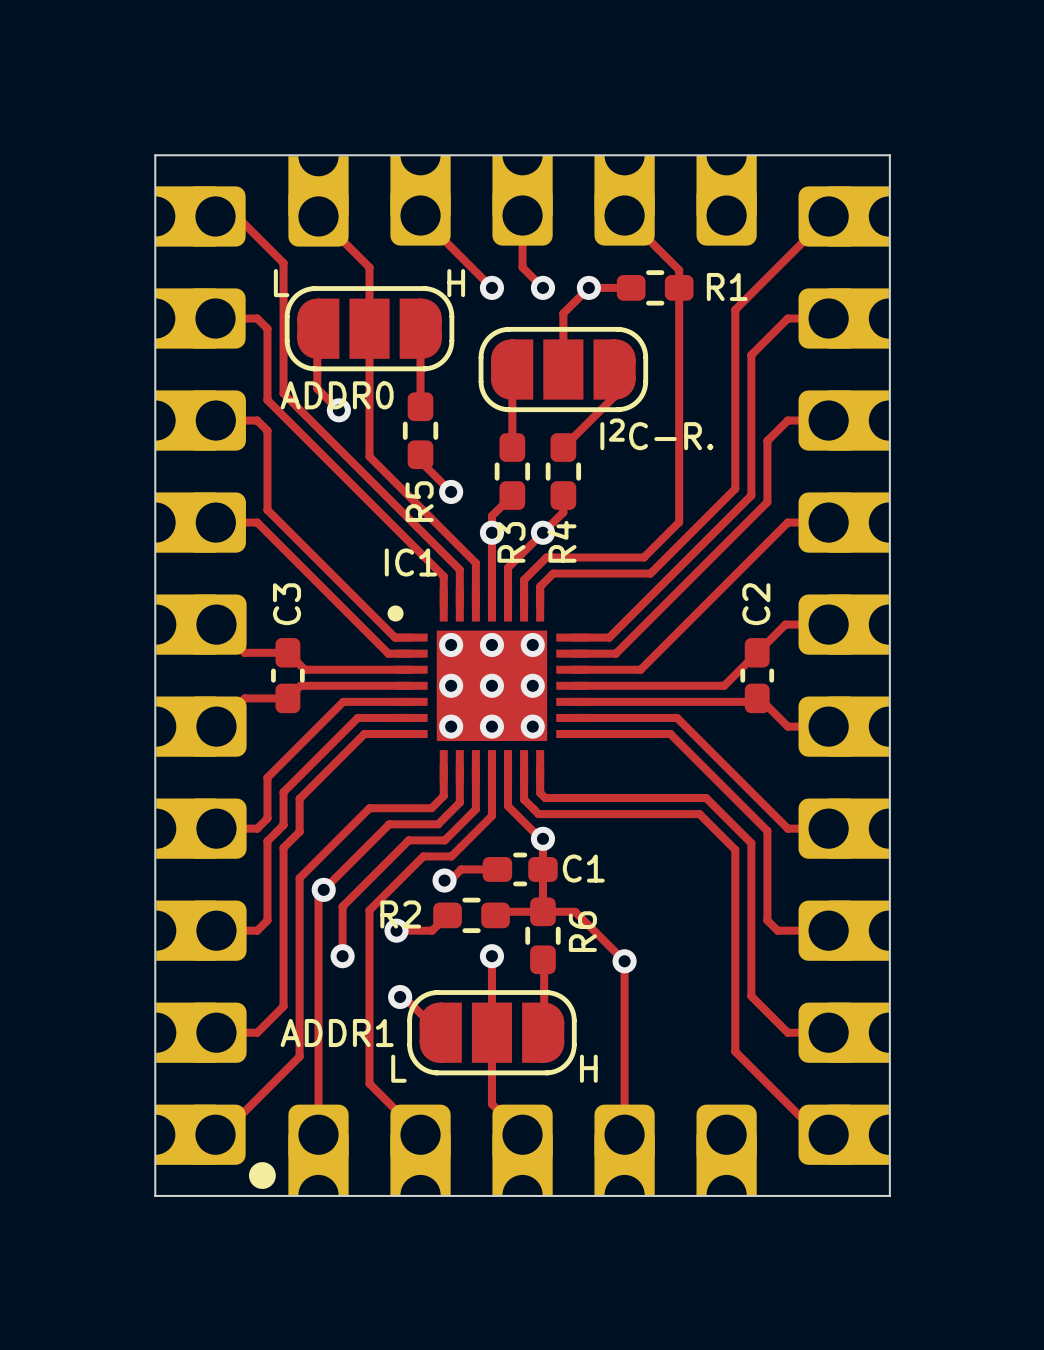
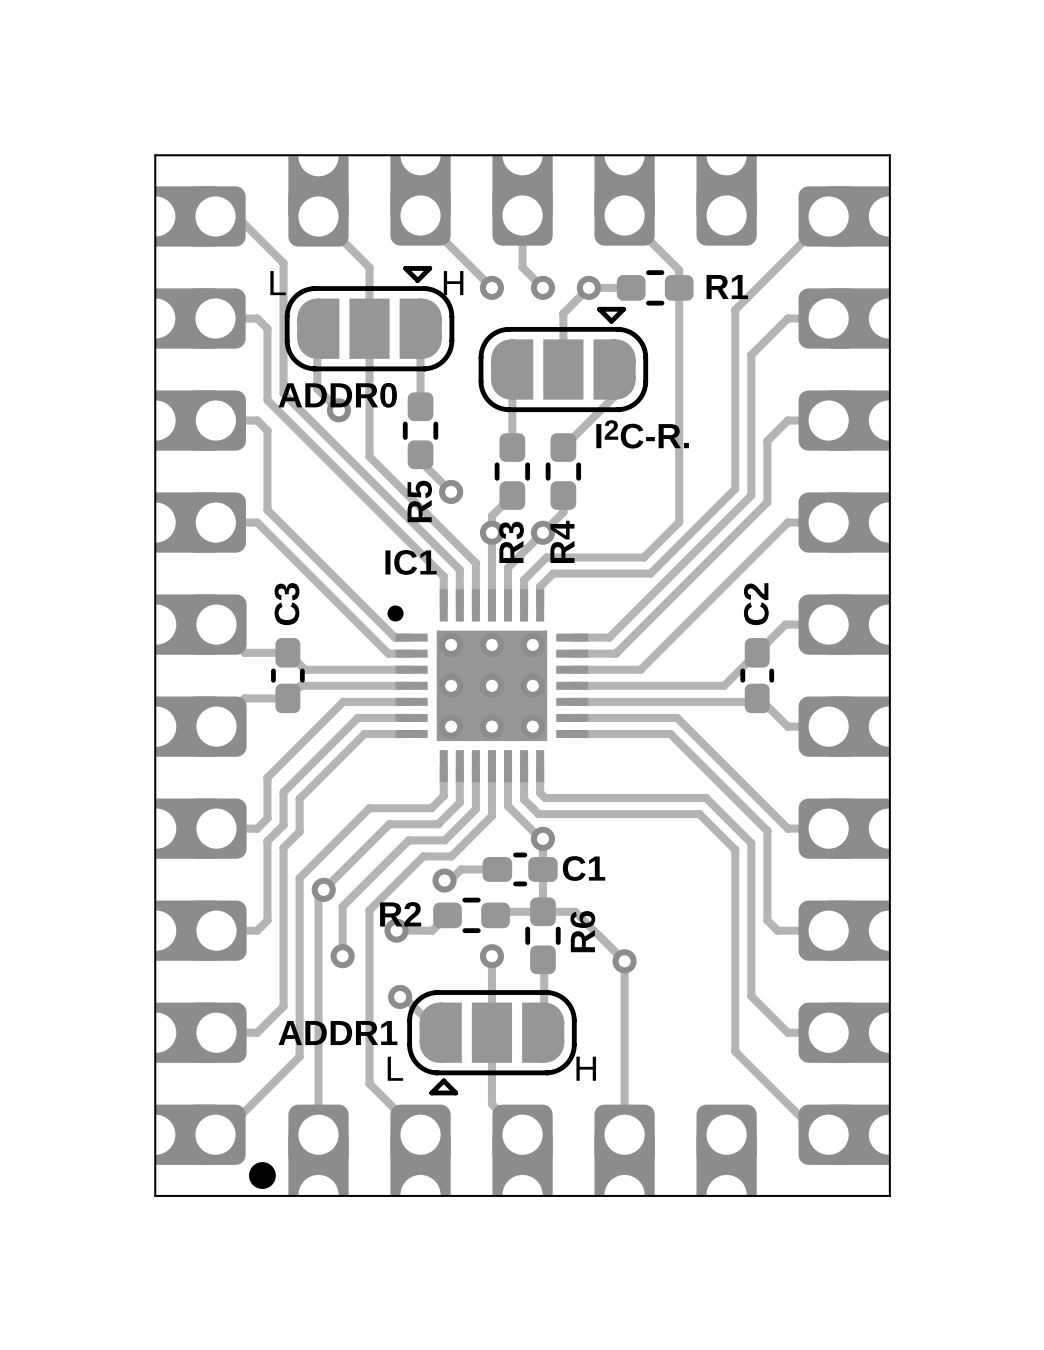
part footprint: [284, 286, 455, 372] -> [284, 266, 455, 372]
part footprint: [478, 326, 649, 413] -> [478, 306, 649, 413]
part footprint: [407, 990, 577, 1076] -> [407, 990, 577, 1096]

